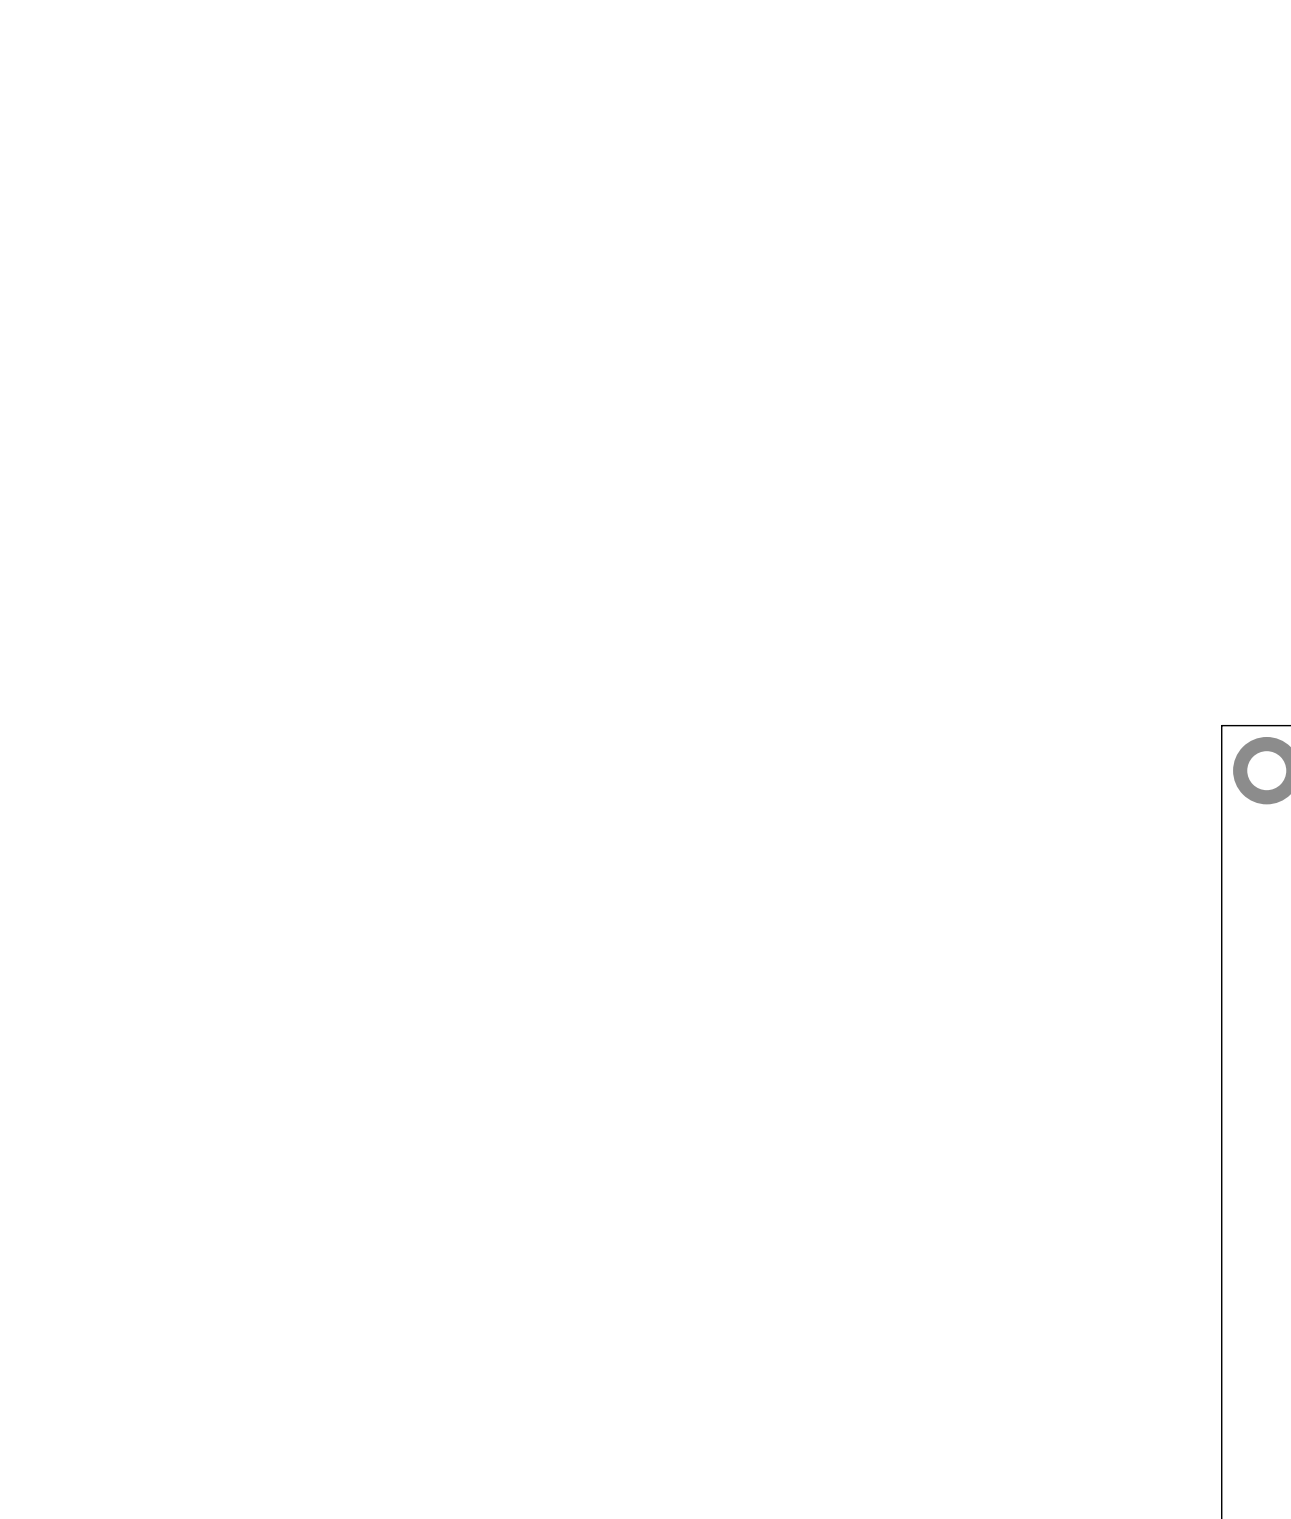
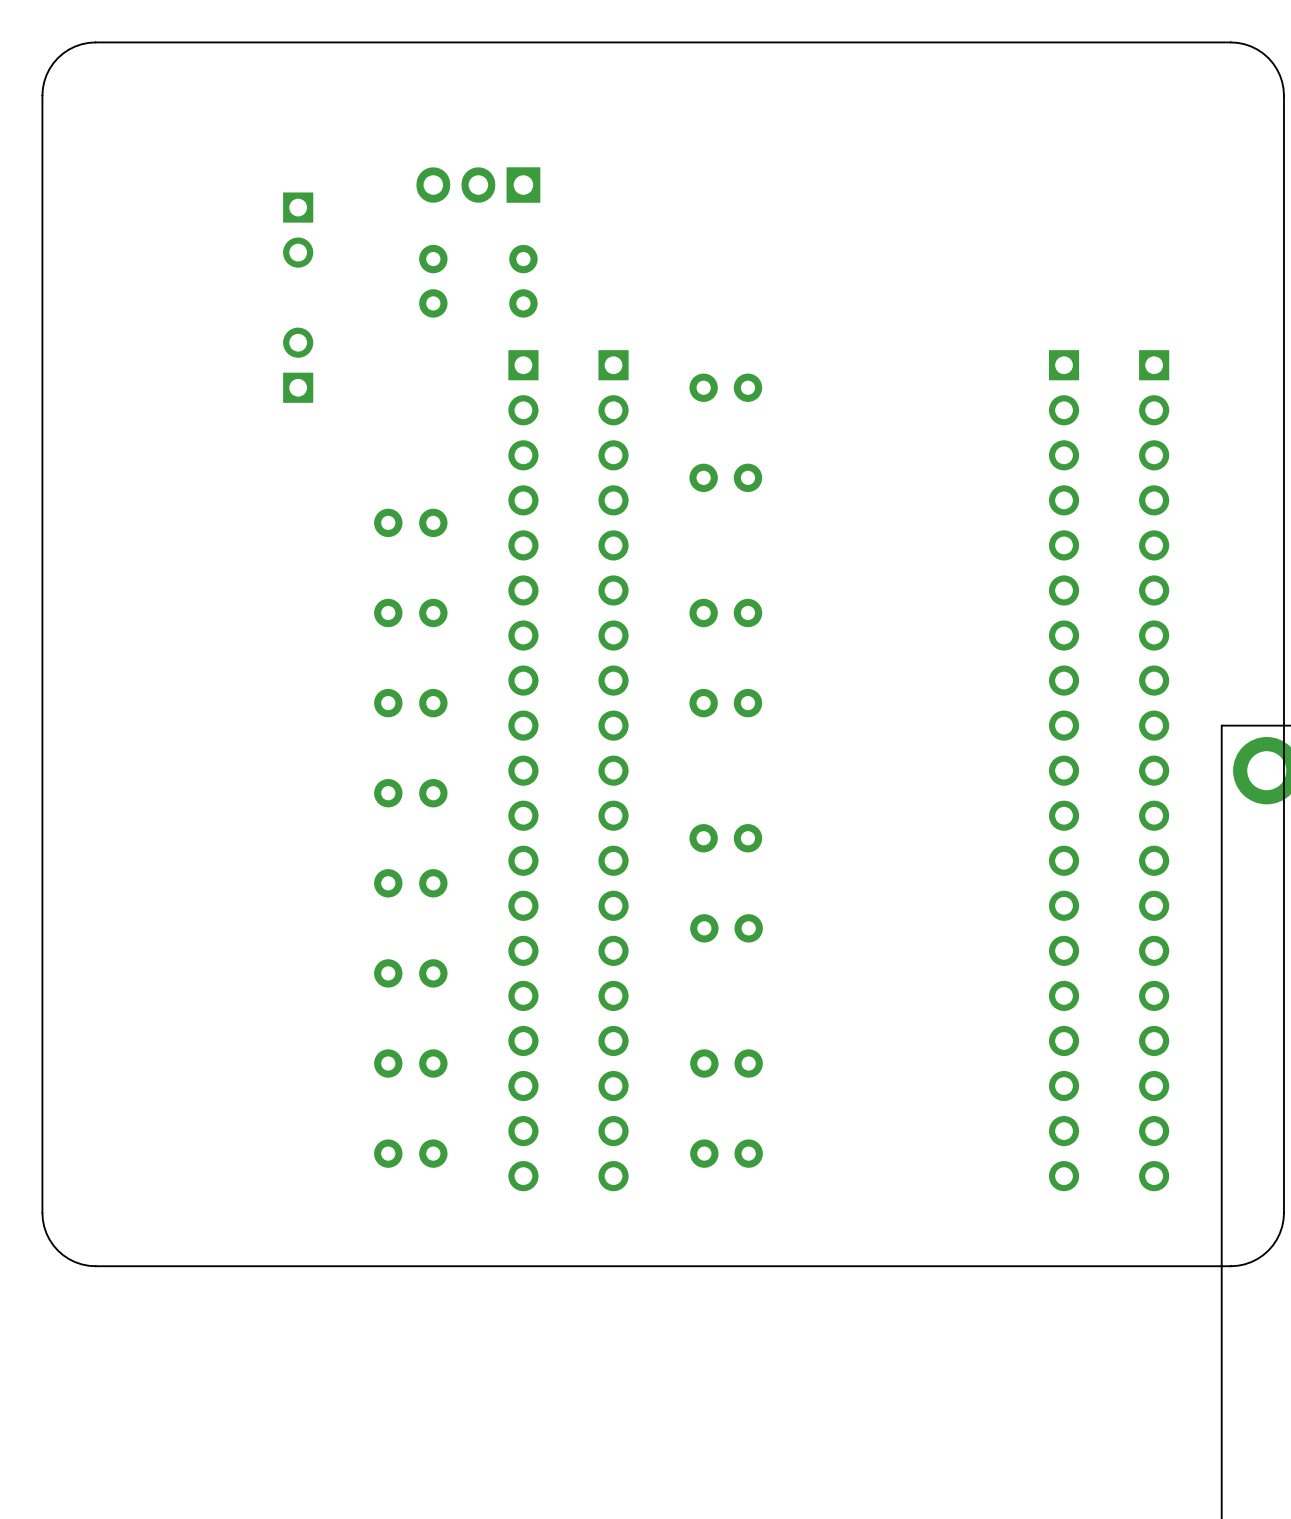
board edge: none -> (1230, 42) (95, 42) (75, 46) (58, 58) (46, 75) (42, 95) (42, 1213) (46, 1233) (58, 1250) (75, 1262) (95, 1266) (1230, 1266) (1251, 1262) (1268, 1250) (1279, 1233) (1283, 1213) (1283, 95) (1279, 75) (1268, 58) (1251, 46) (1230, 42)
part: none -> (478, 185)
part: none -> (298, 230)
part: none -> (433, 281)
part: none -> (523, 281)
part: none -> (298, 365)
part: none -> (725, 387)
part: none -> (725, 477)
part: none -> (410, 522)
part: none -> (410, 613)
part: none -> (725, 613)
part: none -> (410, 703)
part: none -> (725, 703)
part: none -> (523, 770)
part: none -> (613, 770)
part: none -> (1064, 770)
part: none -> (1154, 770)
part: none -> (410, 793)
part: none -> (725, 838)
part: none -> (410, 883)
part: none -> (726, 928)
part: none -> (410, 973)
part: none -> (410, 1063)
part: none -> (726, 1063)
part: none -> (410, 1153)
part: none -> (726, 1153)

